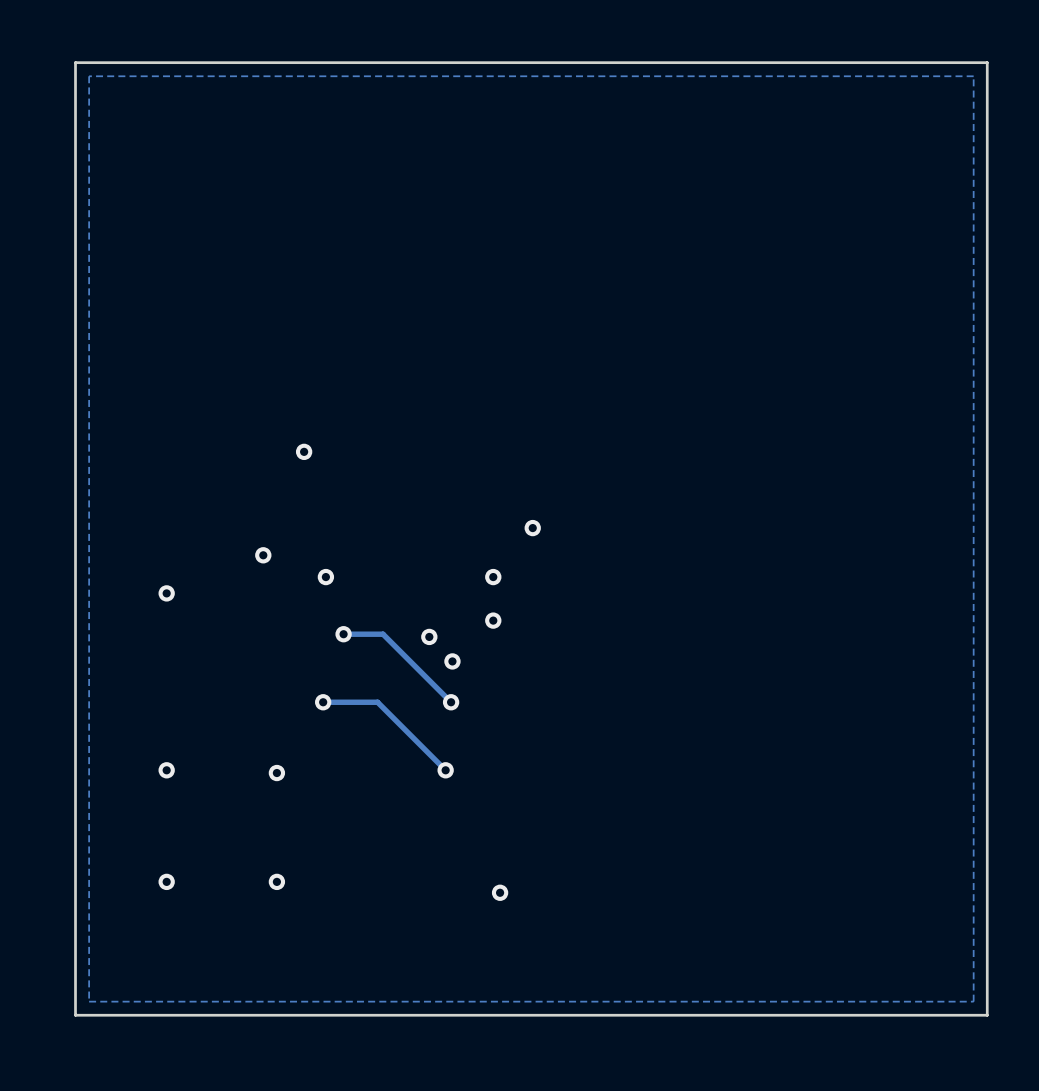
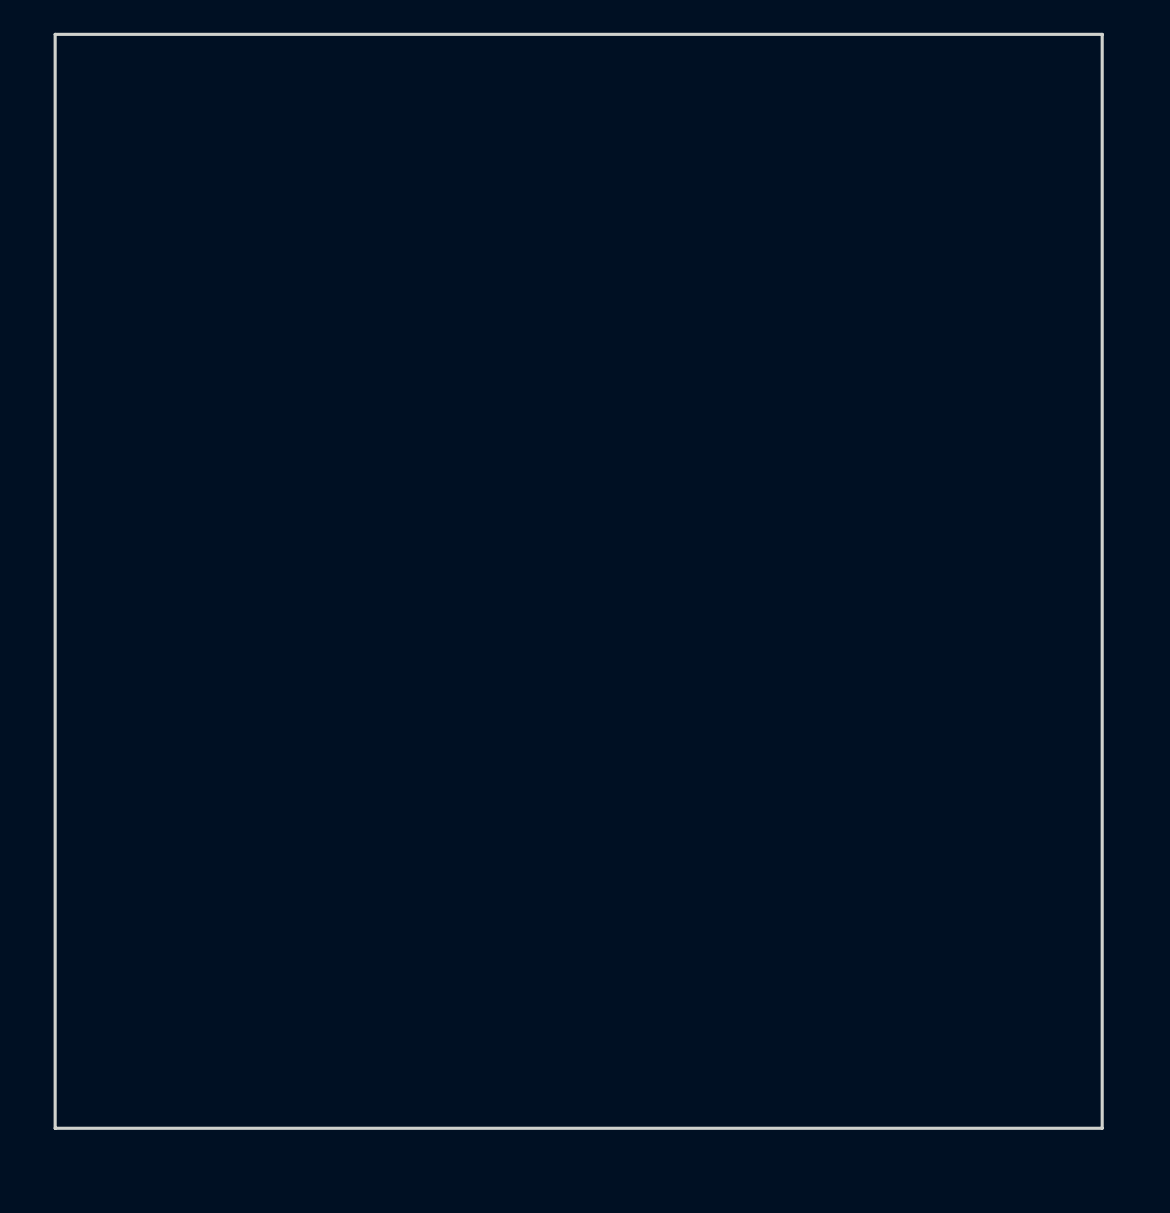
zone outline: (973, 76) (89, 76) (89, 1001) (973, 1001) (973, 76) -> none
via: (304, 451) -> none
via: (532, 528) -> none
via: (263, 555) -> none
via: (325, 577) -> none
via: (493, 577) -> none
via: (166, 593) -> none
via: (493, 620) -> none
track: (343, 634) (383, 634) (451, 702) -> none
via: (343, 634) -> none
via: (429, 636) -> none
via: (452, 661) -> none
track: (323, 702) (377, 702) (445, 770) -> none
via: (323, 702) -> none
via: (451, 702) -> none
via: (166, 770) -> none
via: (445, 770) -> none
via: (276, 773) -> none
via: (166, 881) -> none
via: (276, 881) -> none
via: (500, 892) -> none

